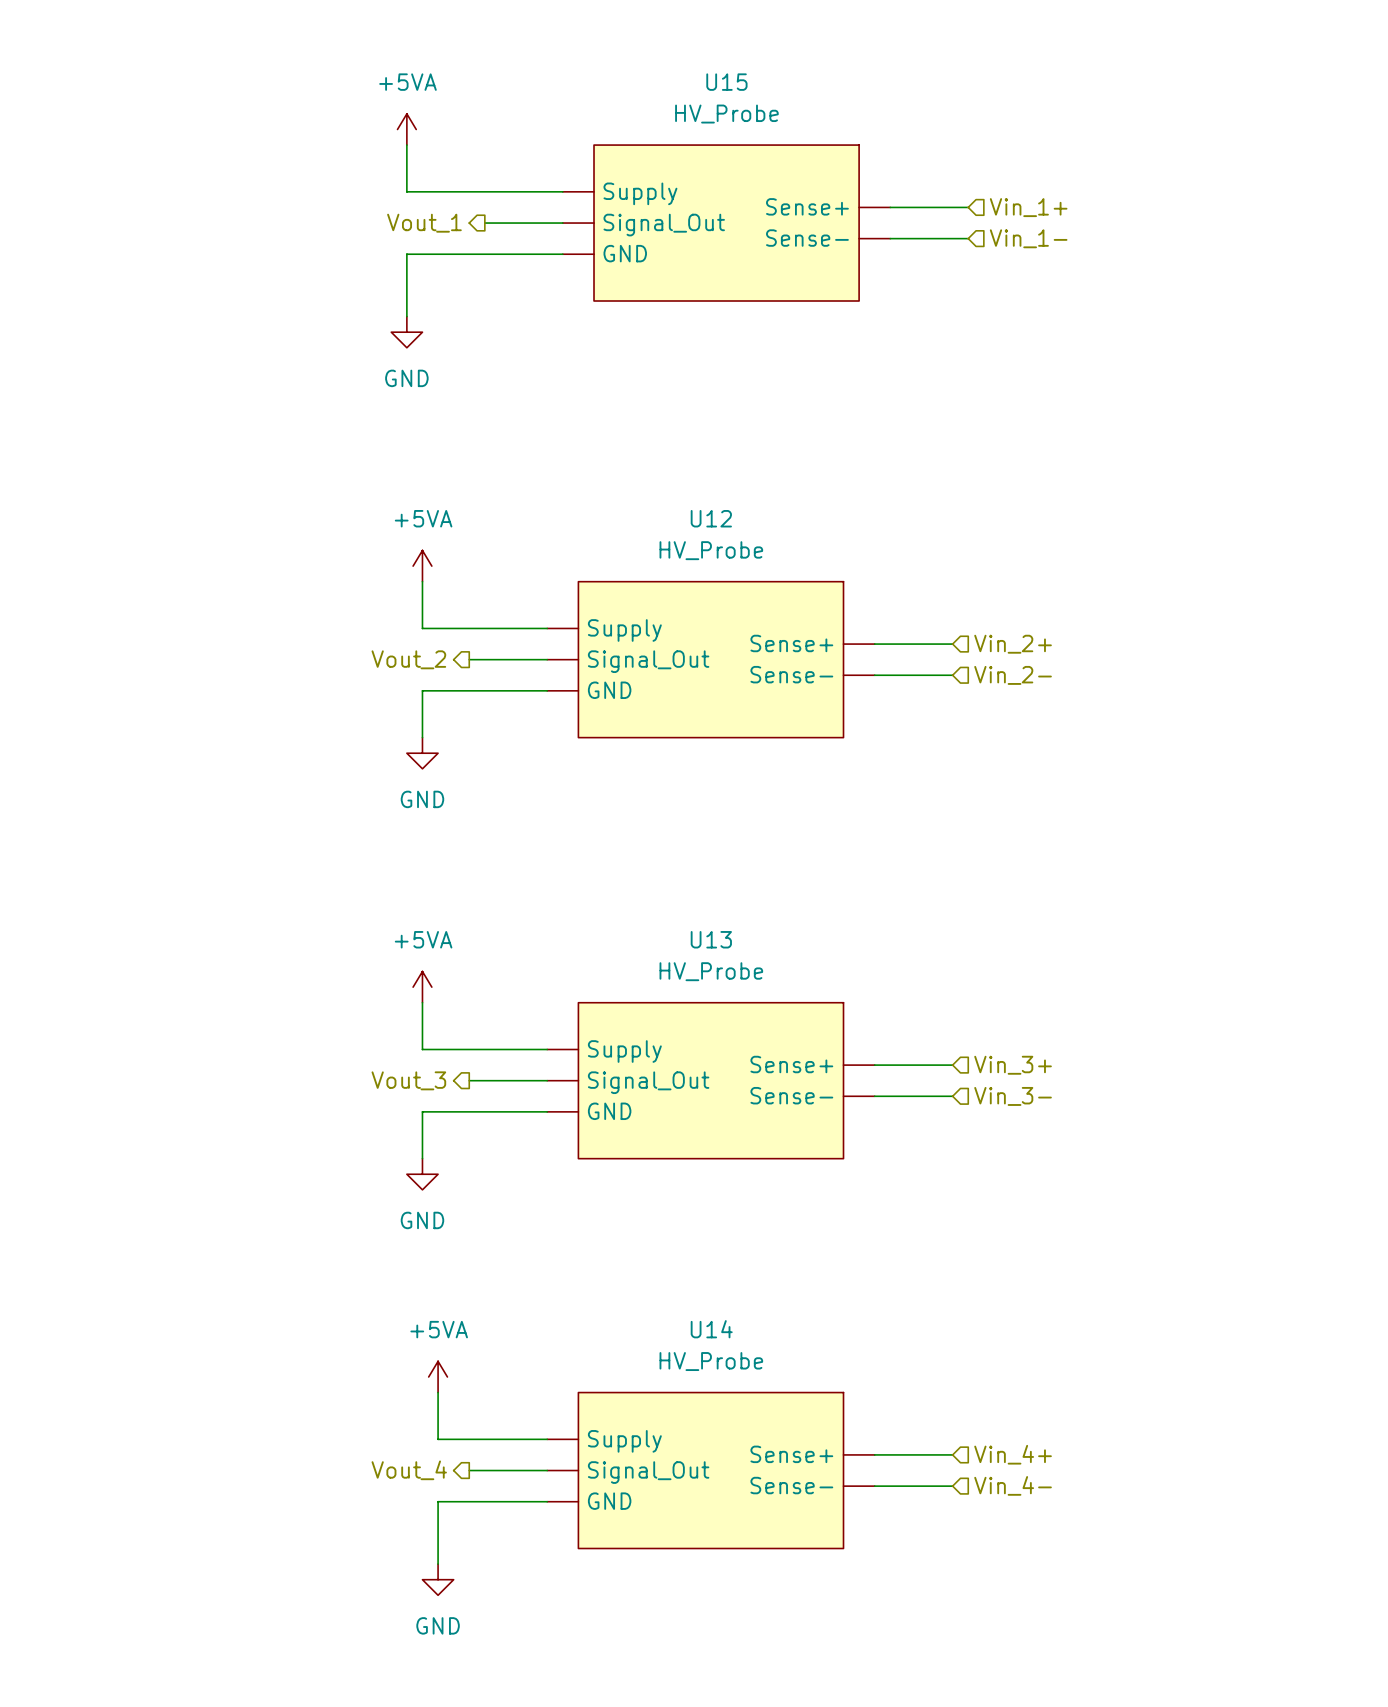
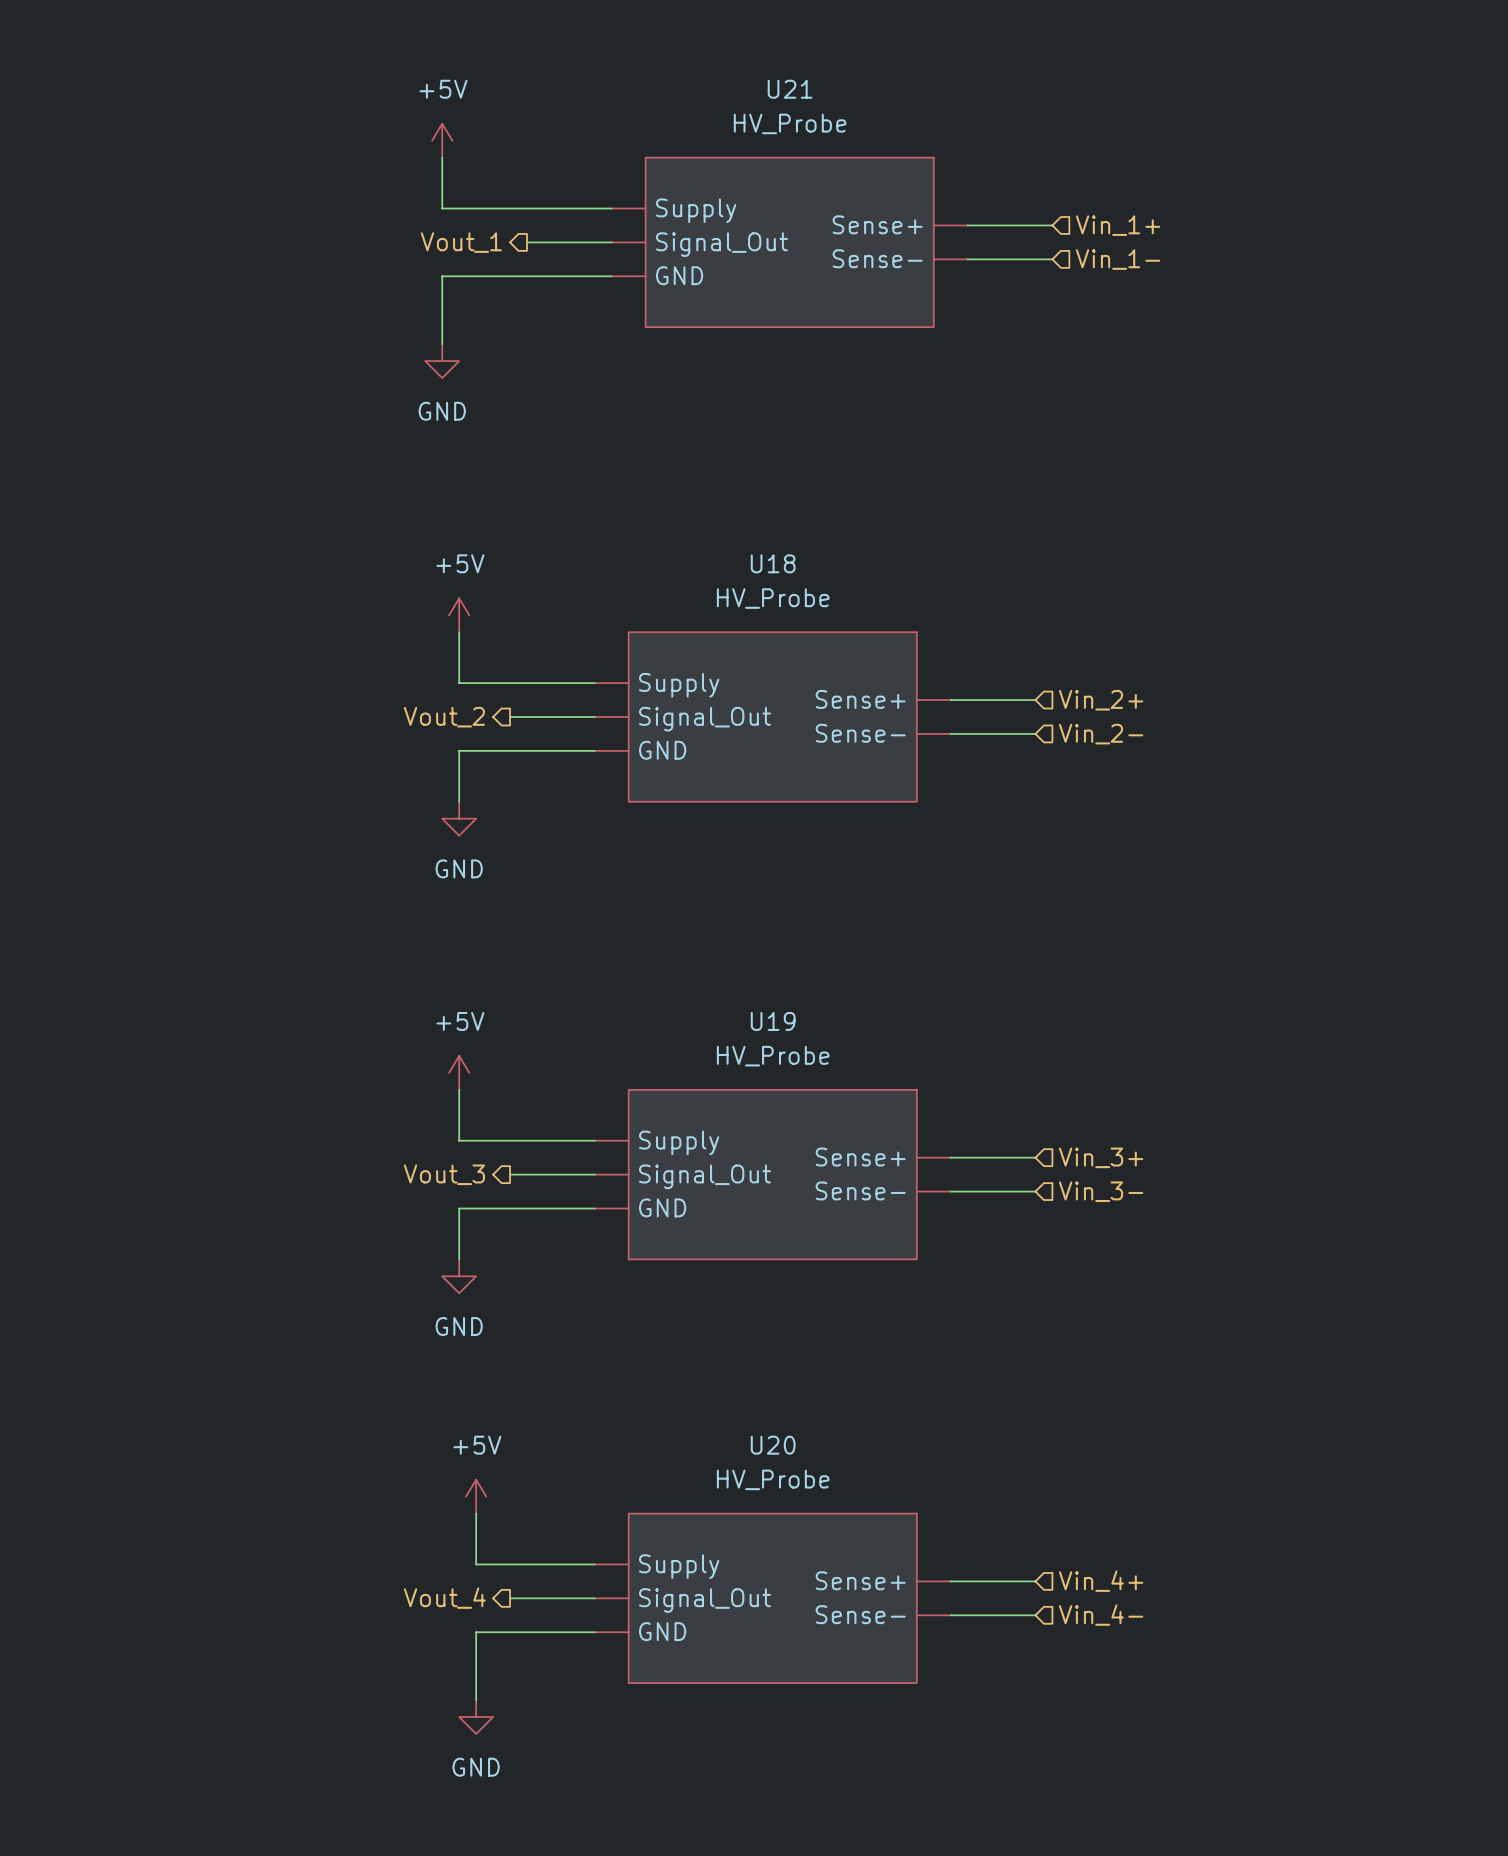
U15 name: U15 (726, 82) -> U21 (790, 89)
power symbol: +5VA (406, 129) -> +5V (442, 140)
U12 name: U12 (711, 518) -> U18 (773, 563)
power symbol: +5VA (422, 566) -> +5V (459, 615)
U13 name: U13 (711, 939) -> U19 (773, 1021)
power symbol: +5VA (422, 987) -> +5V (459, 1072)
U14 name: U14 (711, 1329) -> U20 (773, 1445)
power symbol: +5VA (438, 1376) -> +5V (476, 1496)

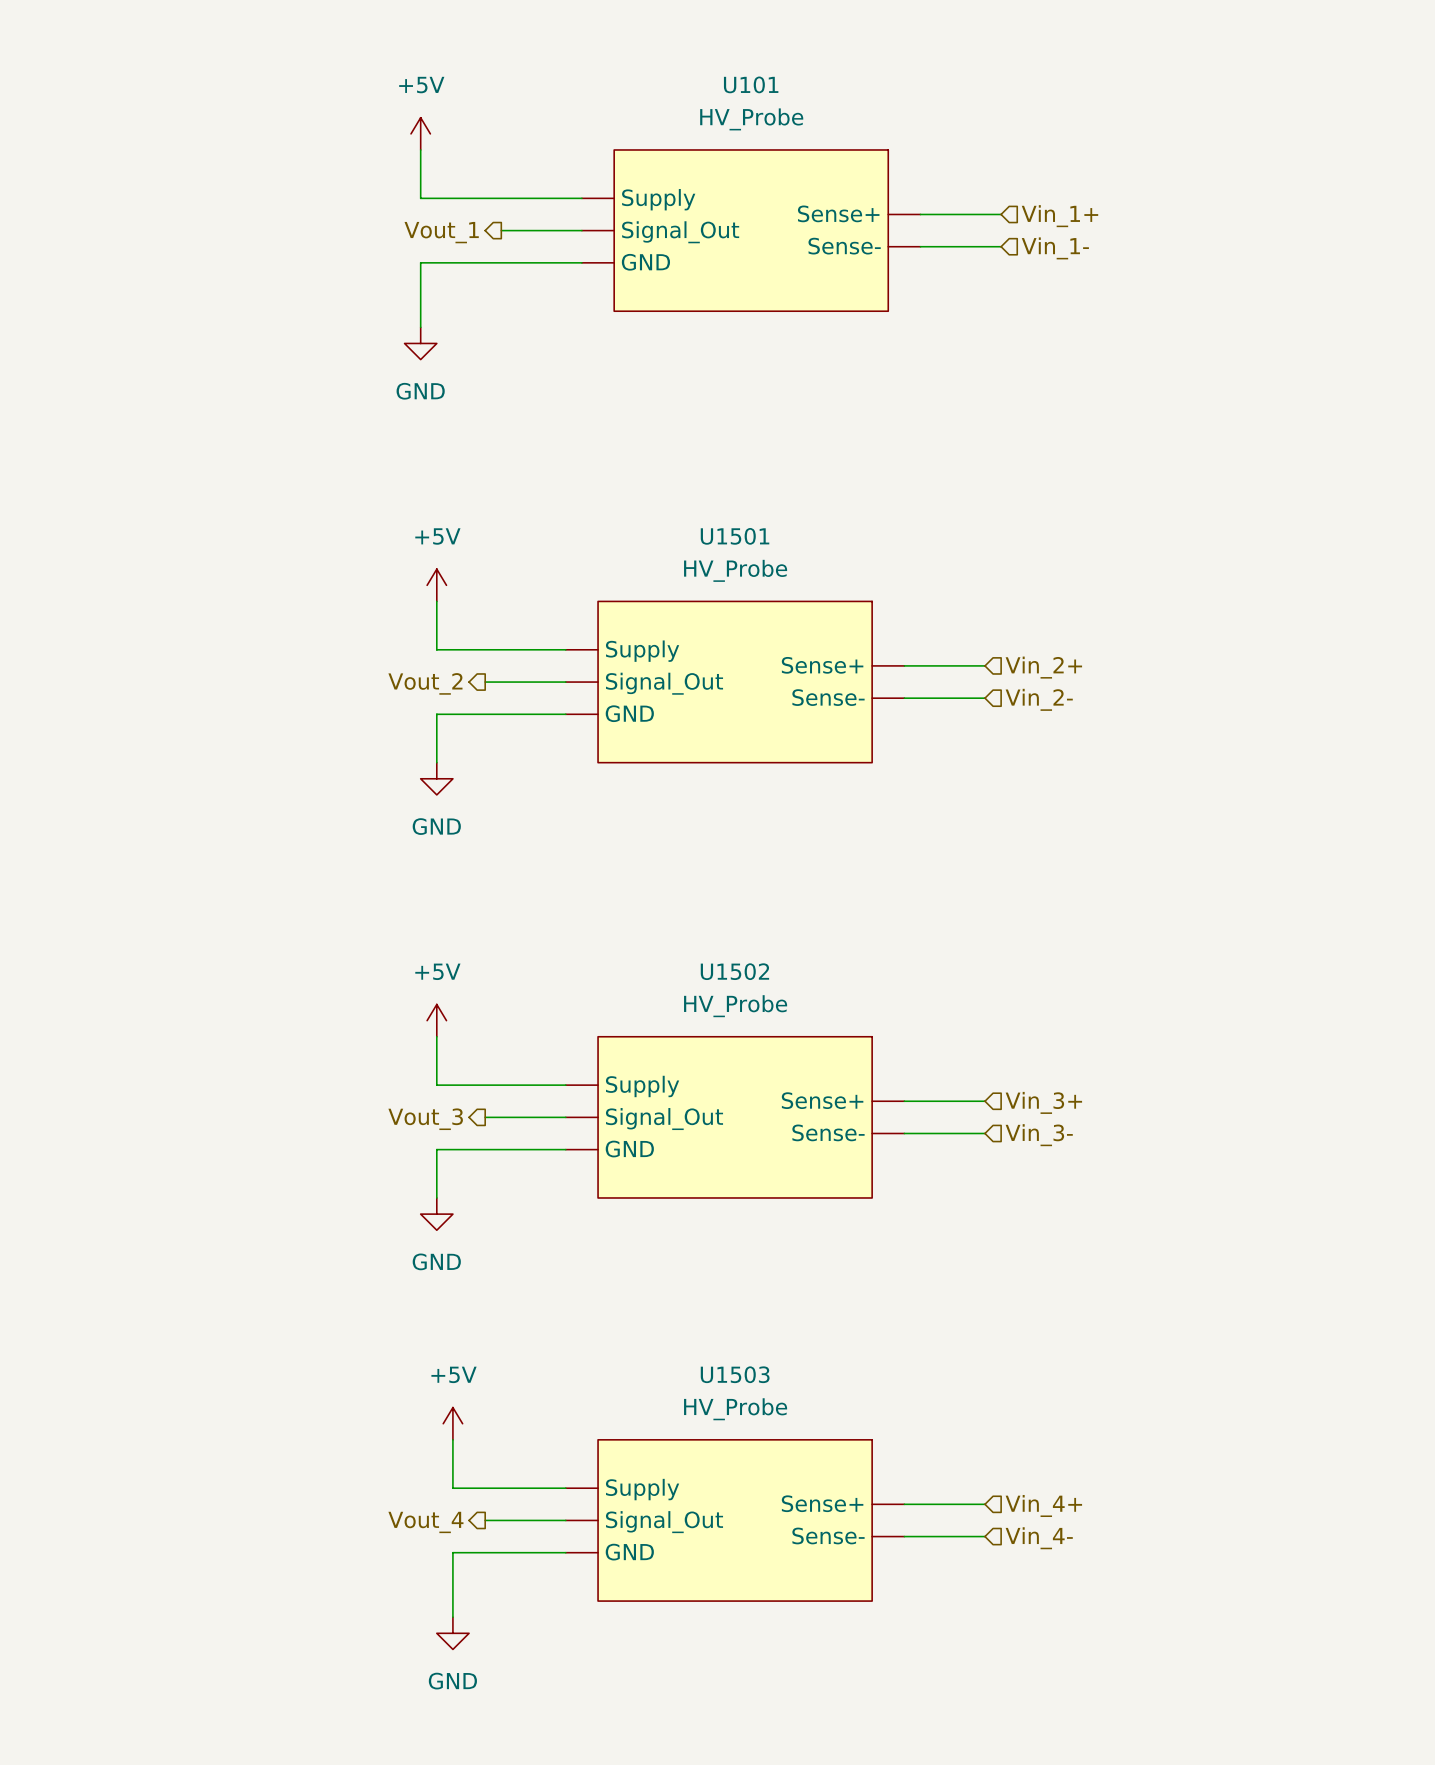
U21 name: U21 (790, 89) -> U101 (751, 84)
U18 name: U18 (773, 563) -> U1501 (735, 536)
U19 name: U19 (773, 1021) -> U1502 (734, 971)
U20 name: U20 (773, 1445) -> U1503 (735, 1374)

